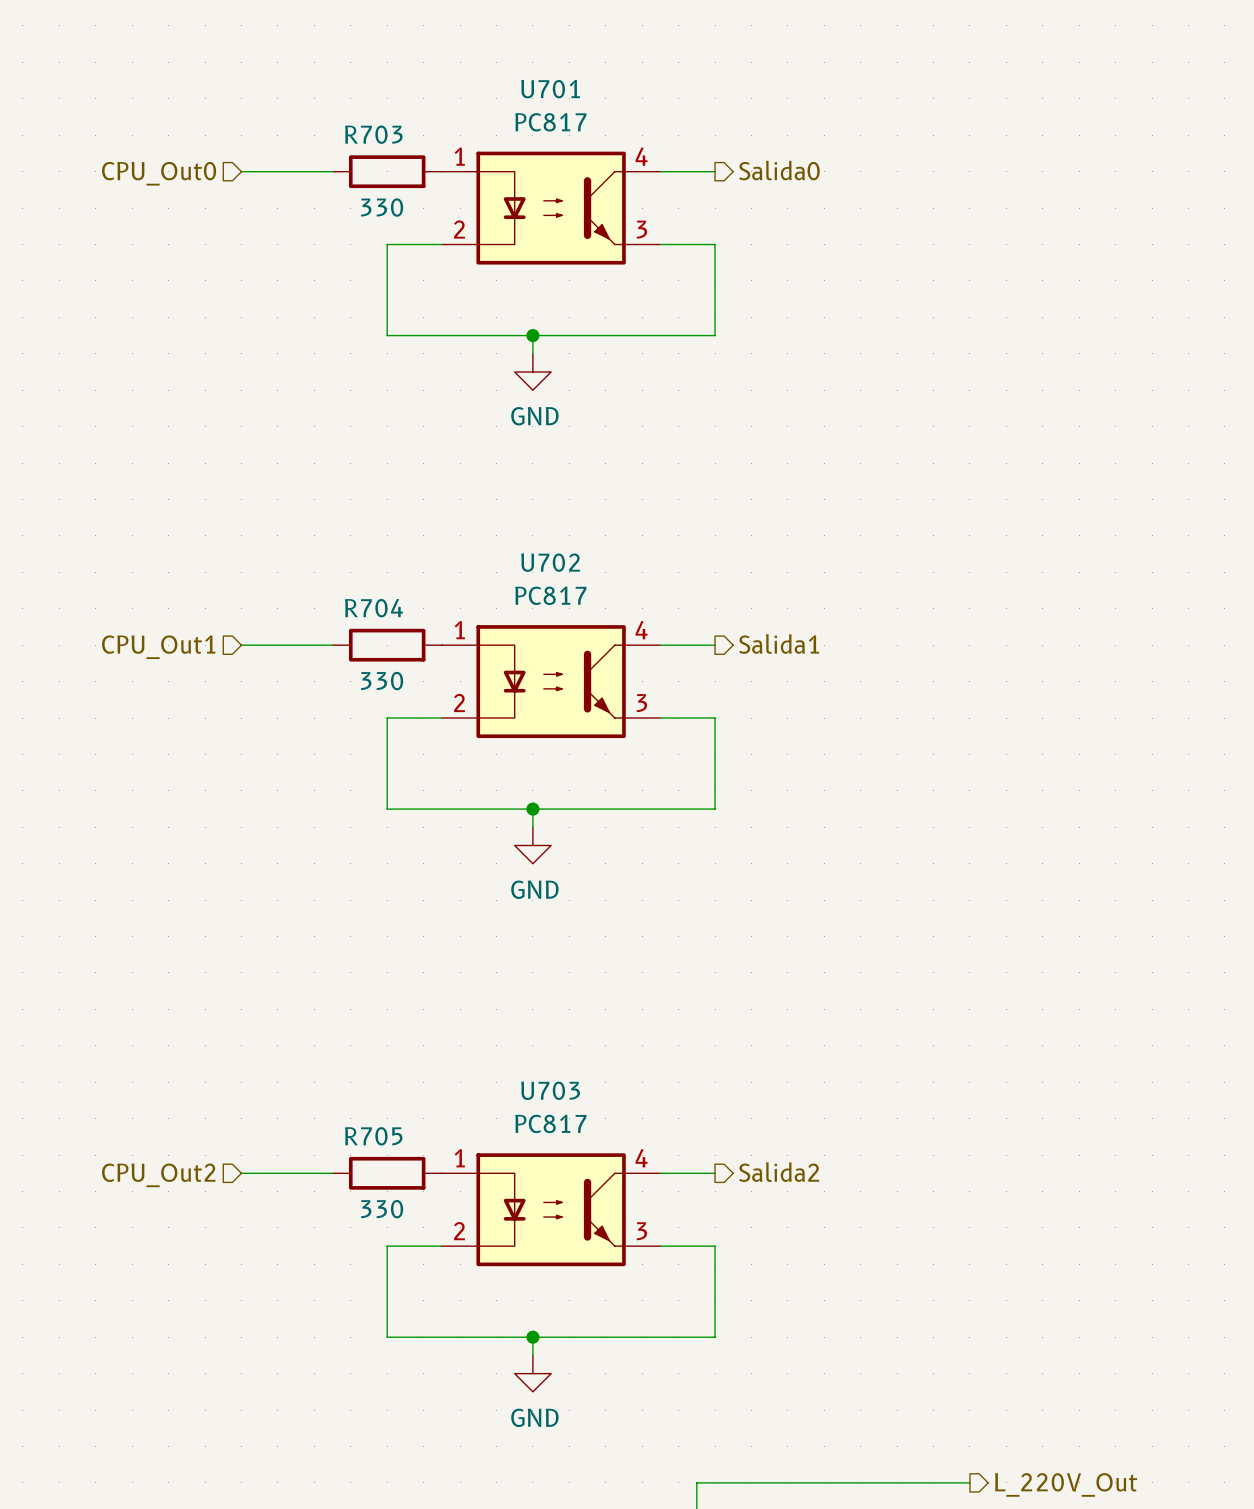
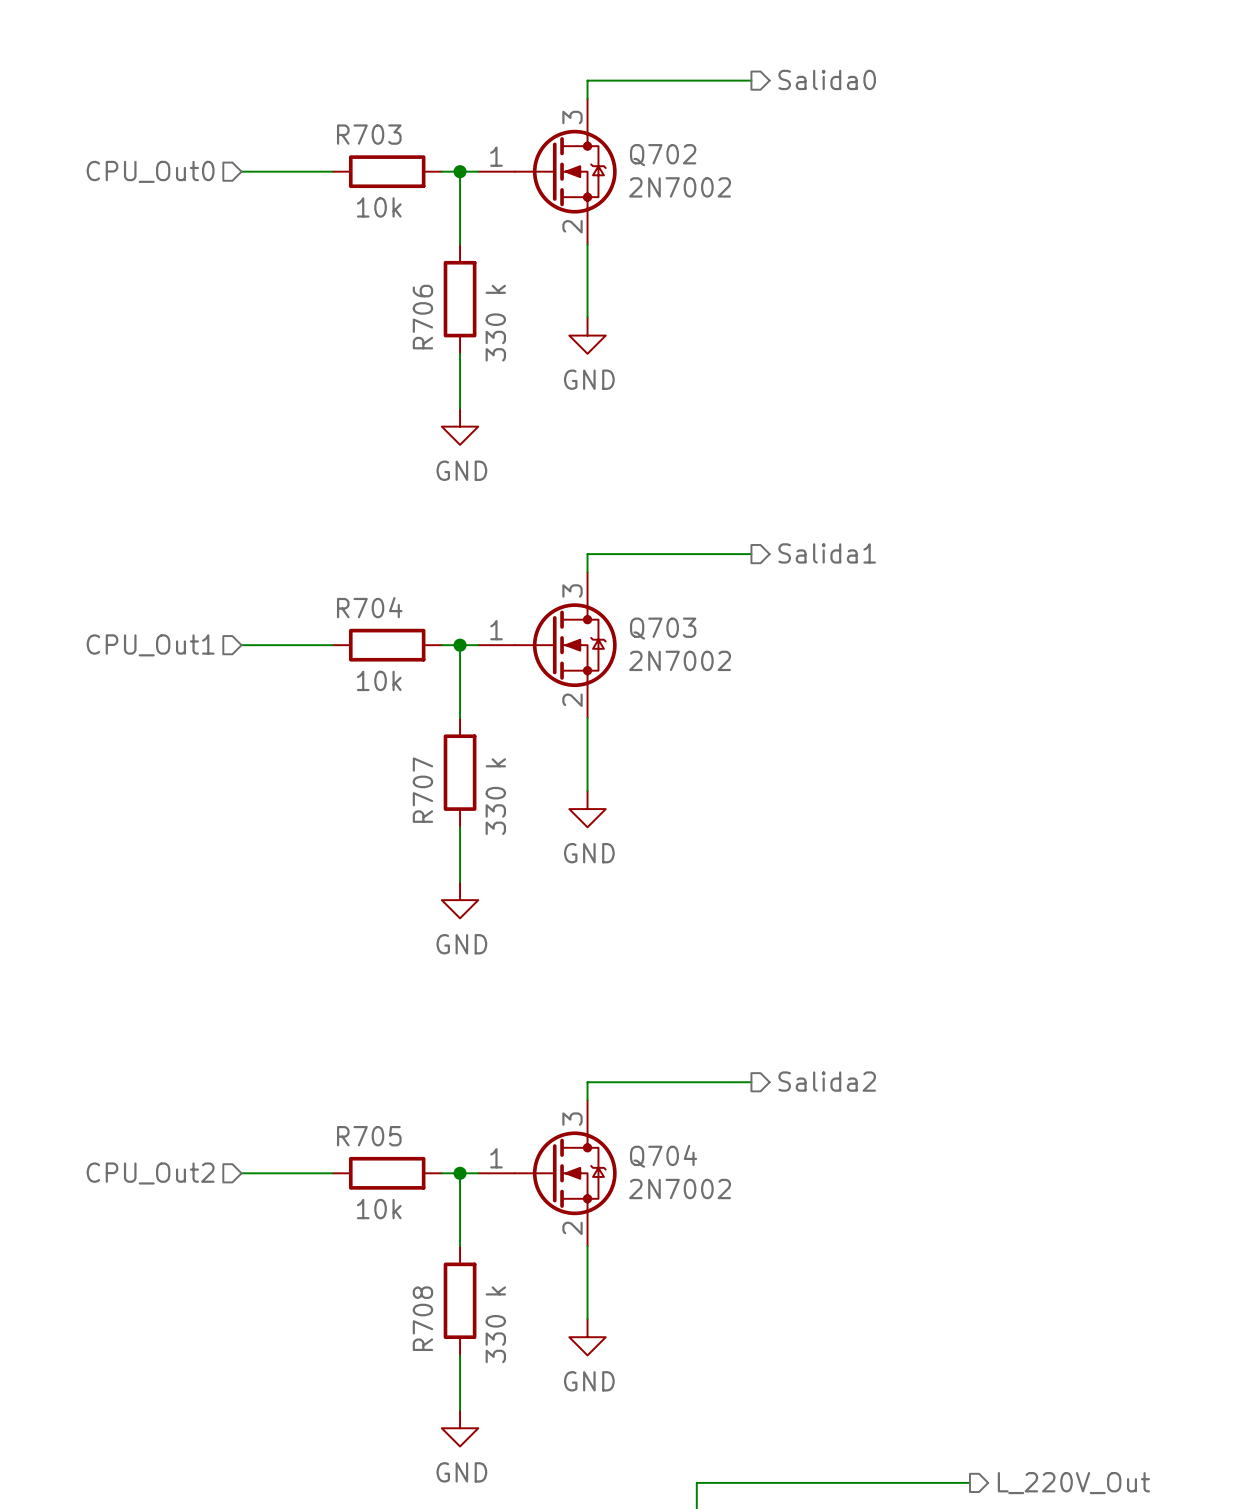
wire: none -> (751, 80) (587, 80) (587, 98)
hierarchical label position: Salida0 (779, 170) -> Salida0 (827, 79)
wire: none -> (460, 171) (460, 244)
junction: none -> (460, 171)
Q702: none -> 2N7002 (547, 171)
wire: (660, 171) (715, 171) -> none
R703 value: 330 (382, 207) -> 10k (379, 207)
U701: PC817 (551, 208) -> none
wire: (441, 244) (387, 244) (387, 335) (715, 335) (715, 244) (660, 244) -> none
wire: none -> (587, 244) (587, 317)
R706: none -> 330 k (460, 299)
wire: (532, 335) (532, 353) -> none
junction: (532, 335) -> none
power symbol: none -> GND (587, 335)
wire: none -> (460, 353) (460, 408)
power symbol: GND (532, 372) -> none
power symbol: none -> GND (460, 426)
wire: none -> (751, 554) (587, 554) (587, 572)
hierarchical label position: Salida1 (779, 643) -> Salida1 (827, 553)
wire: none -> (460, 645) (460, 718)
junction: none -> (460, 645)
Q703: none -> 2N7002 (547, 645)
wire: (660, 645) (715, 645) -> none
R704 value: 330 (382, 681) -> 10k (379, 680)
U702: PC817 (551, 681) -> none
wire: (441, 718) (387, 718) (387, 809) (715, 809) (715, 718) (660, 718) -> none
wire: none -> (587, 718) (587, 790)
R707: none -> 330 k (460, 772)
wire: (532, 809) (532, 827) -> none
junction: (532, 809) -> none
power symbol: none -> GND (587, 809)
wire: none -> (460, 827) (460, 881)
power symbol: GND (532, 845) -> none
power symbol: none -> GND (460, 900)
wire: none -> (751, 1082) (587, 1082) (587, 1100)
hierarchical label position: Salida2 (779, 1172) -> Salida2 (827, 1081)
wire: none -> (460, 1173) (460, 1246)
junction: none -> (460, 1173)
Q704: none -> 2N7002 (547, 1173)
wire: (660, 1173) (715, 1173) -> none
R705 value: 330 (382, 1209) -> 10k (379, 1209)
U703: PC817 (551, 1209) -> none
wire: (441, 1246) (387, 1246) (387, 1337) (715, 1337) (715, 1246) (660, 1246) -> none
wire: none -> (587, 1246) (587, 1318)
R708: none -> 330 k (460, 1300)
wire: (532, 1337) (532, 1355) -> none
junction: (532, 1337) -> none
power symbol: none -> GND (587, 1337)
wire: none -> (460, 1355) (460, 1410)
power symbol: GND (532, 1373) -> none
power symbol: none -> GND (460, 1428)

